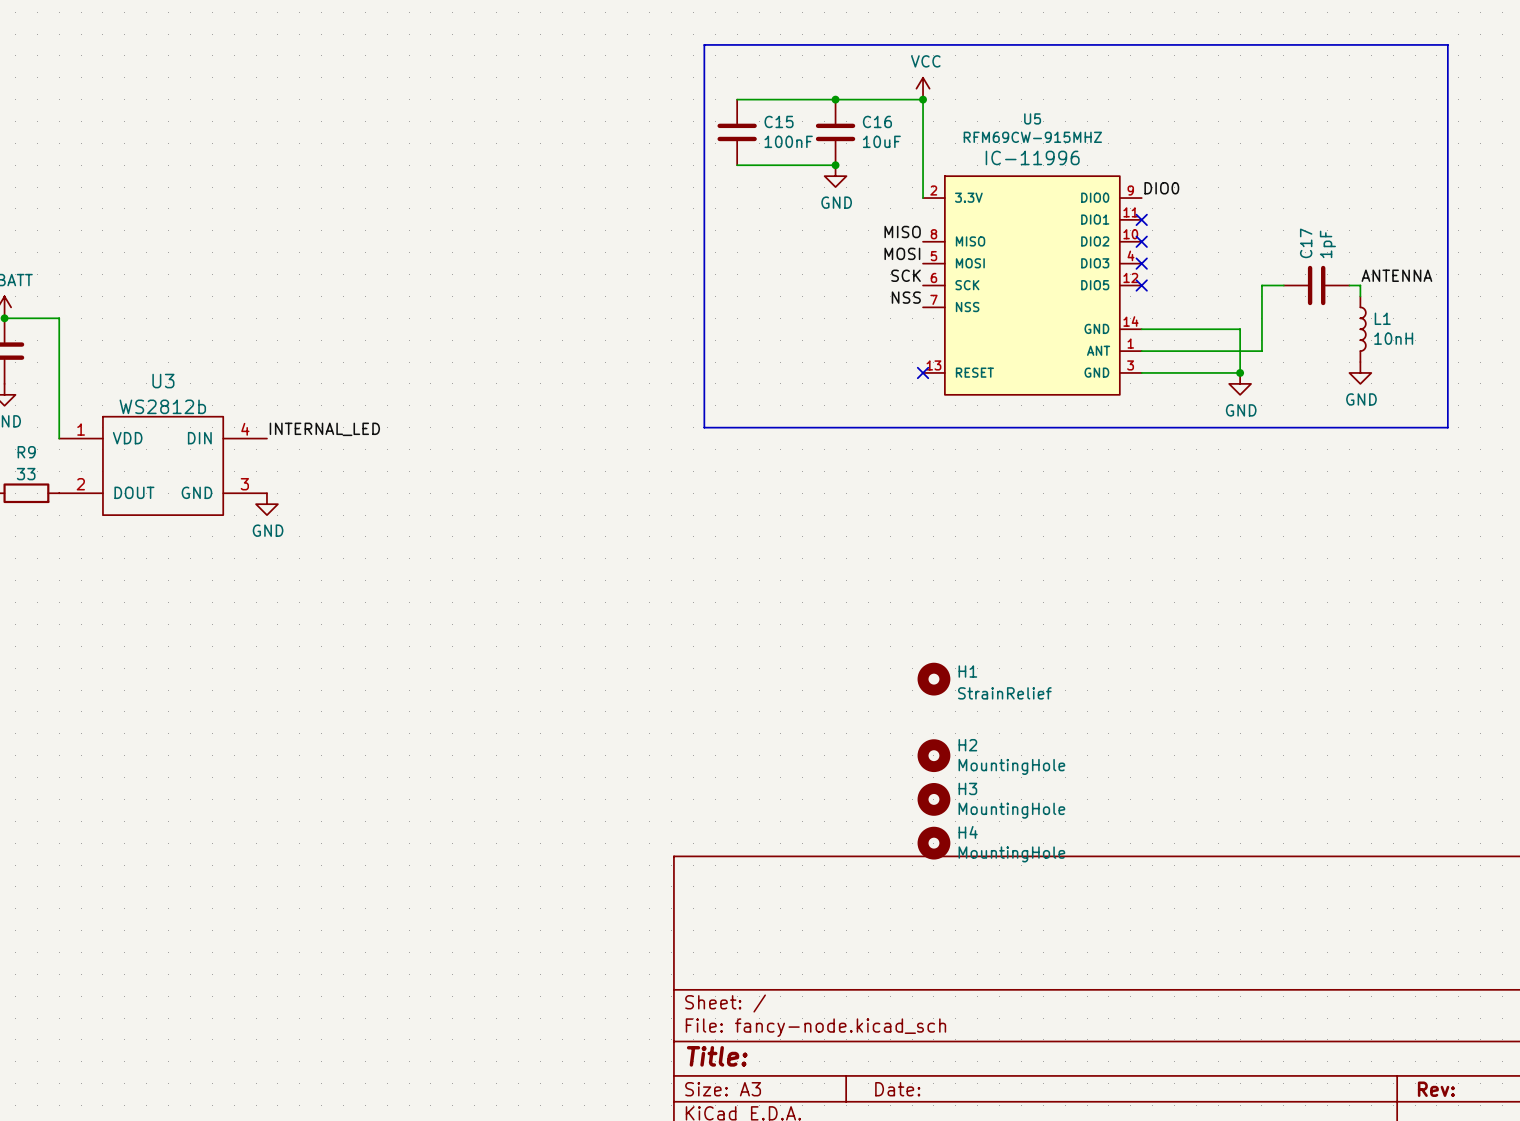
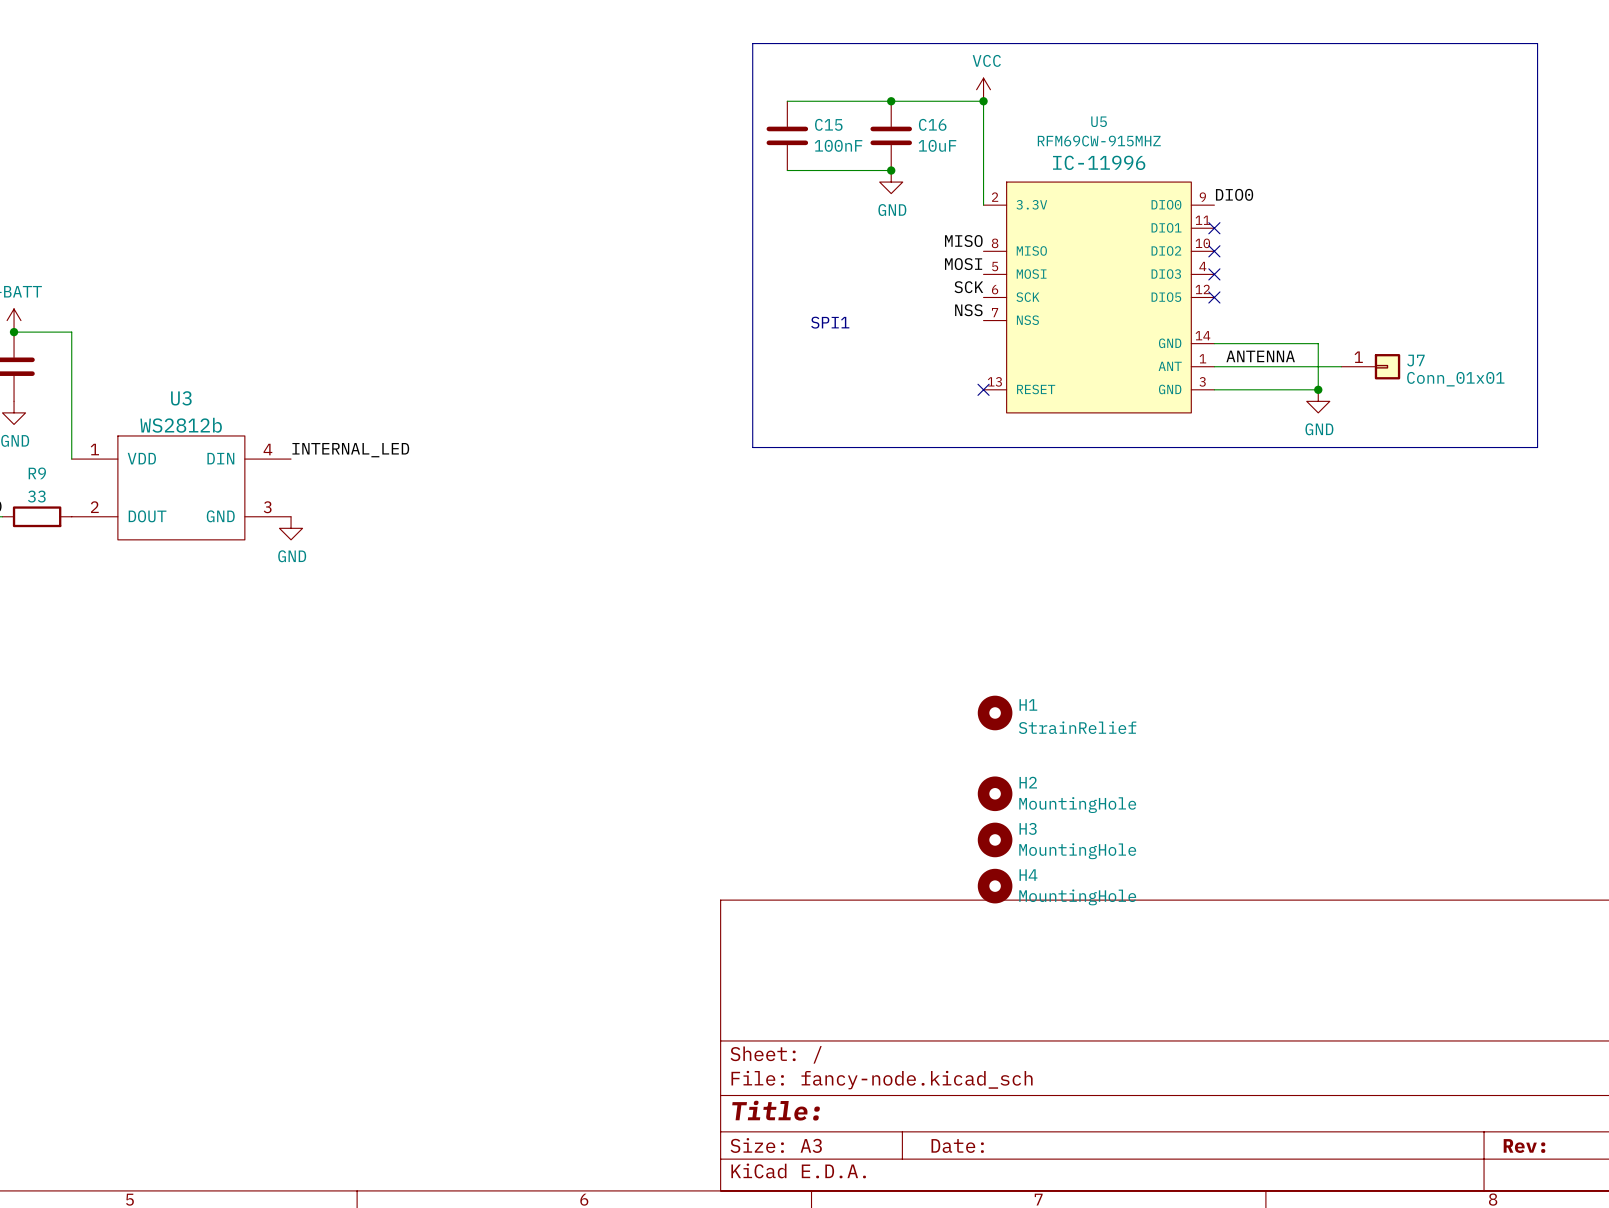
label: ANTENNA (1396, 275) -> none
wire: (1283, 285) (1261, 285) (1261, 351) -> none
C17: 1pF (1316, 285) -> none
wire: (1349, 285) (1360, 285) (1360, 296) -> none
text: none -> SPI1 (830, 322)
L1: 10nH (1363, 329) -> none
label: none -> ANTENNA (1260, 356)
J7: none -> Conn_01x01 (1370, 366)
power symbol: GND (1360, 372) -> none

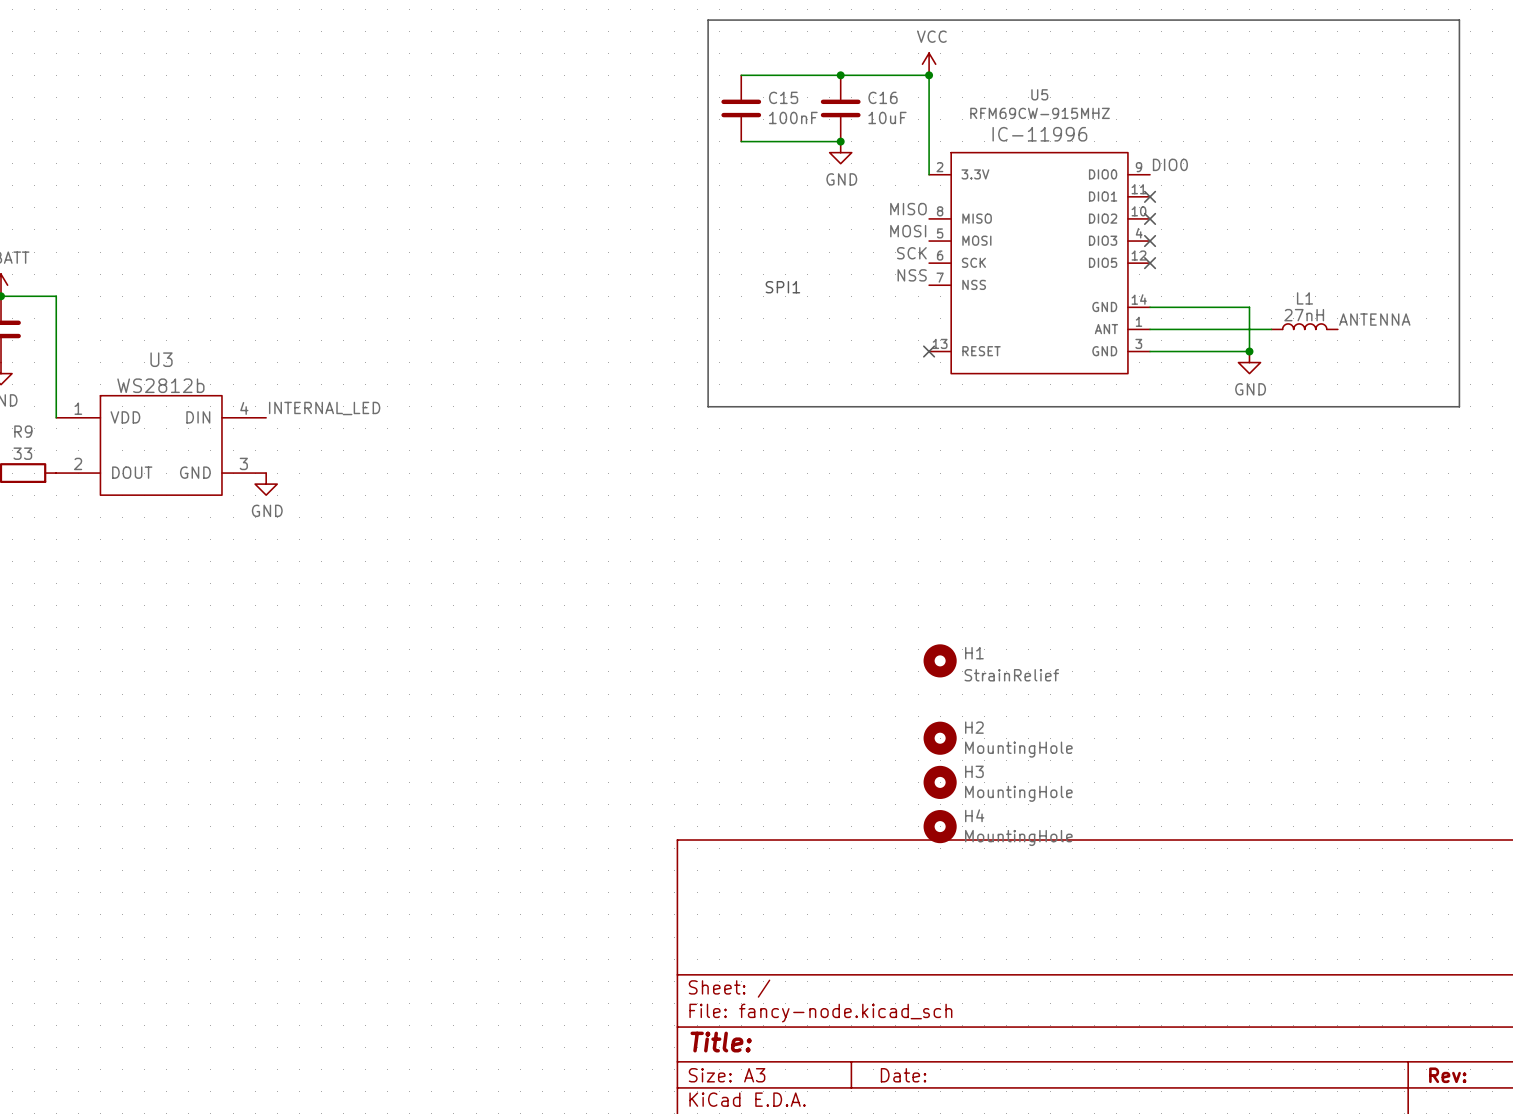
label position: ANTENNA (1260, 356) -> ANTENNA (1374, 319)
L1: none -> 27nH (1304, 326)
J7: Conn_01x01 (1370, 366) -> none

